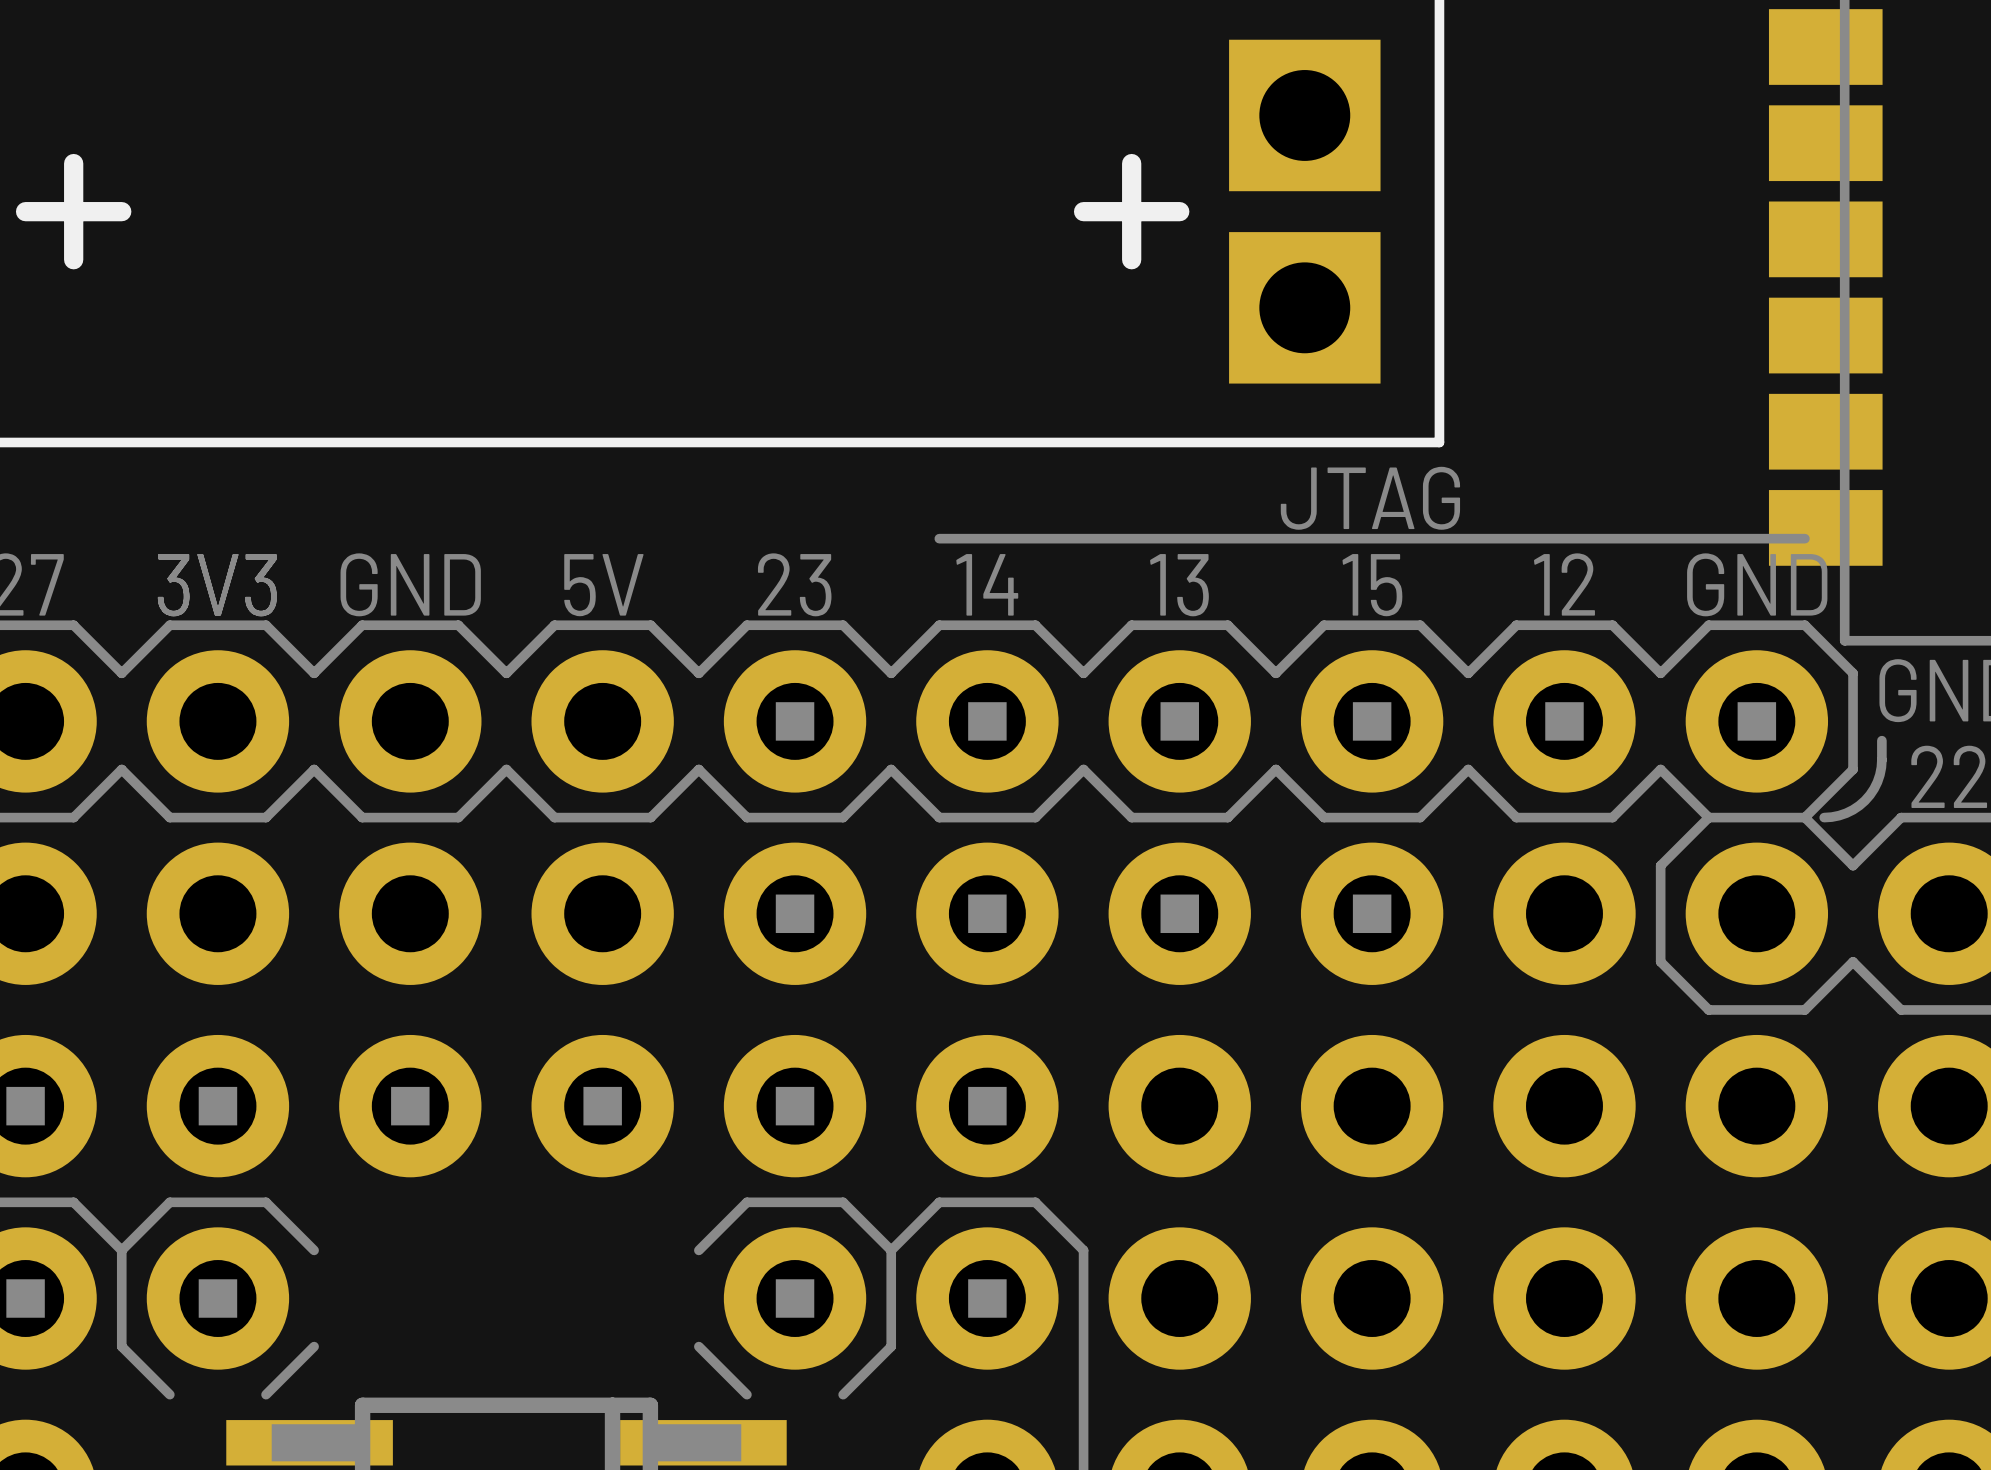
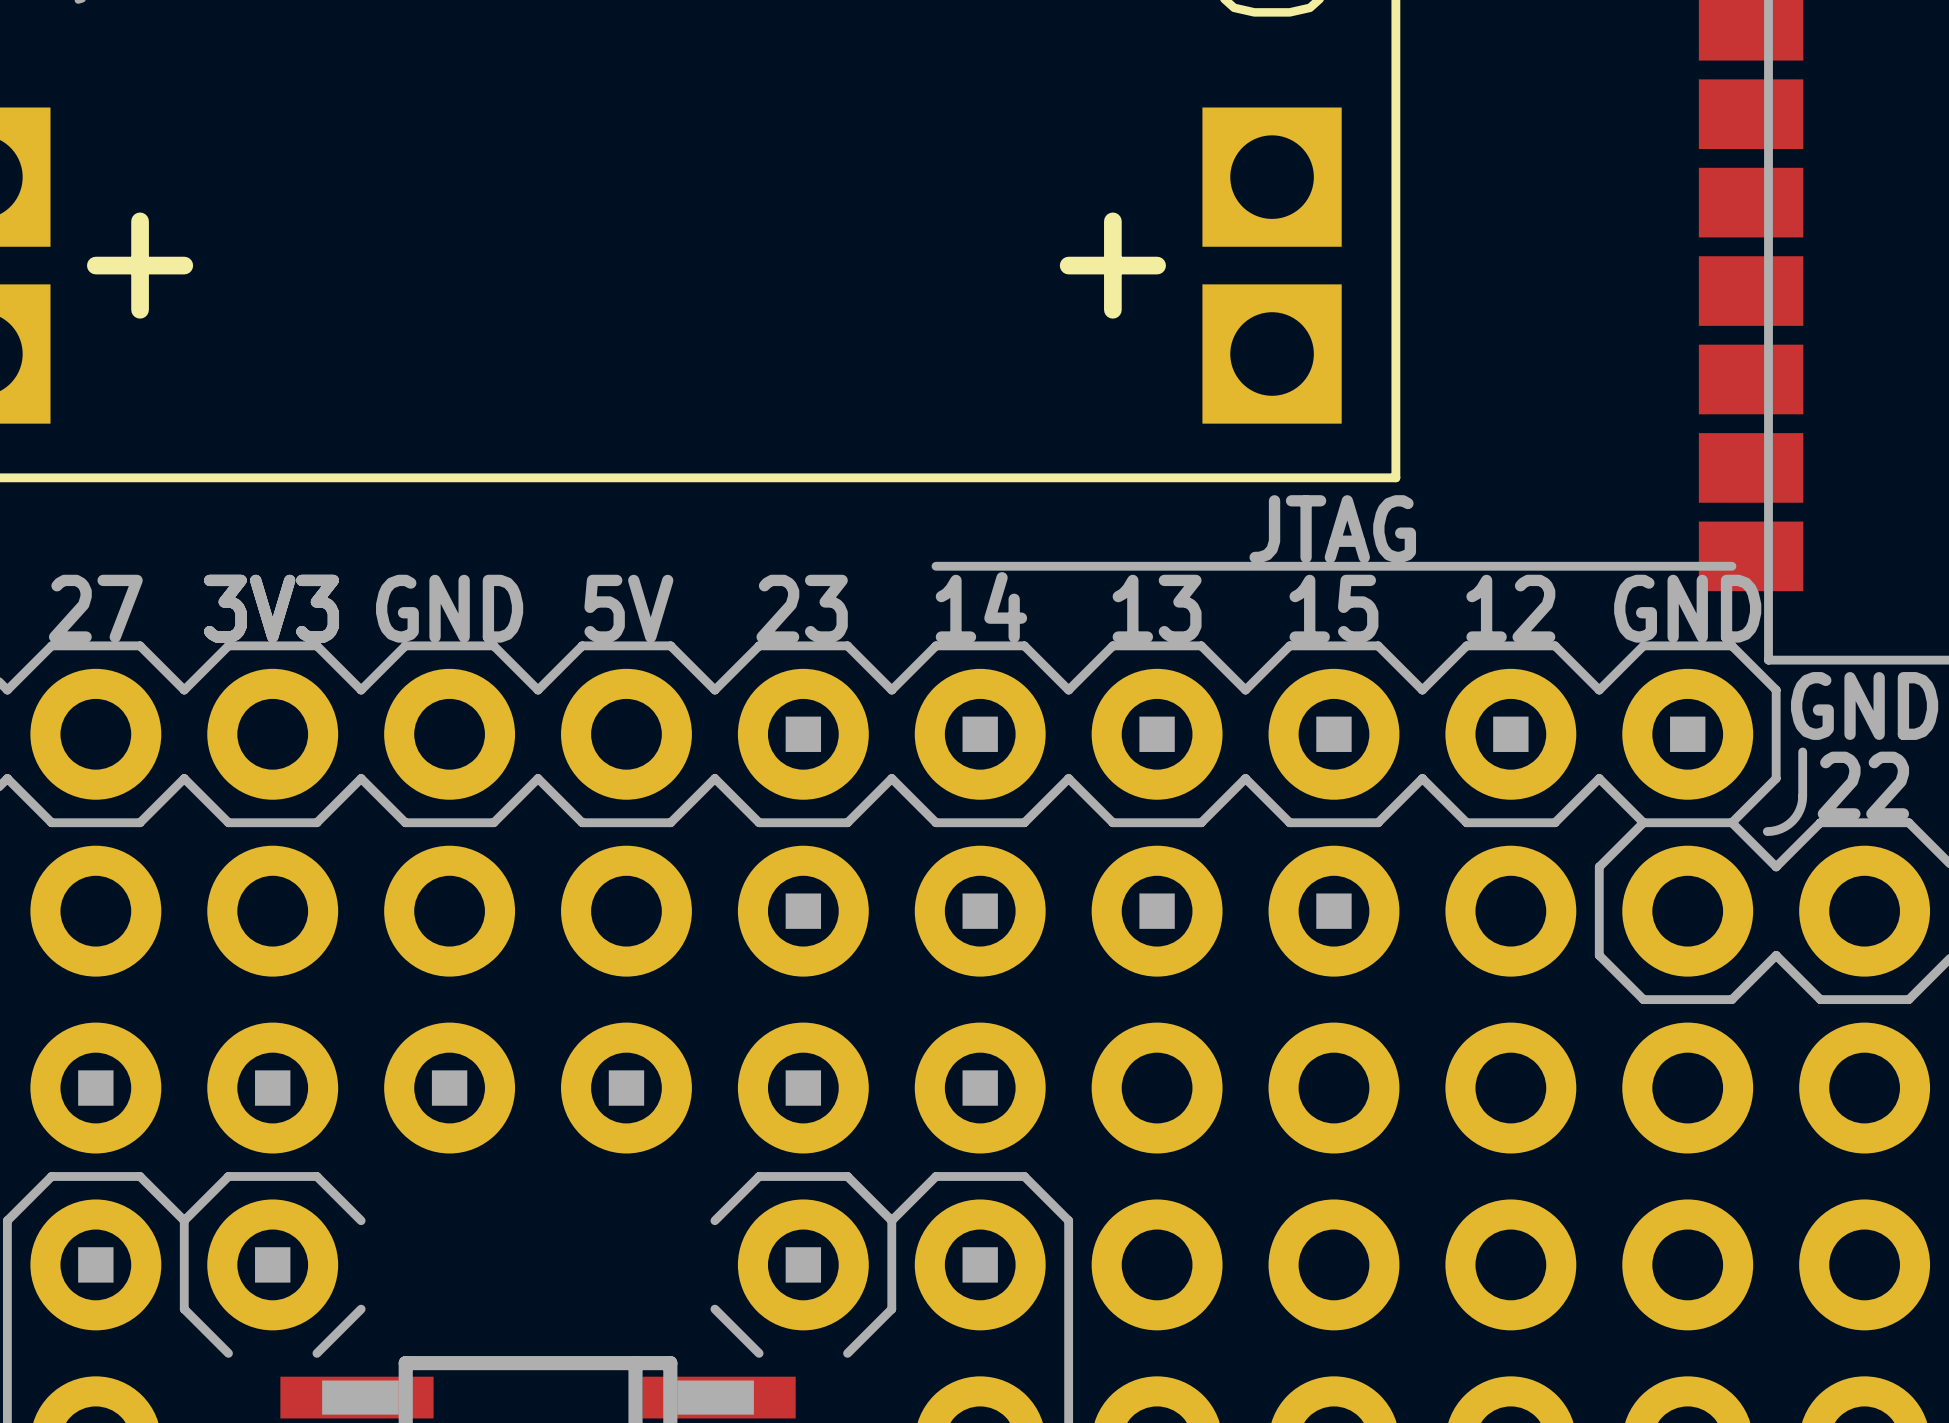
line: (1881, 759) (1877, 781) (1864, 800) (1846, 813) (1824, 817) -> (1802, 769) (1802, 800) (1797, 813) (1785, 826) (1767, 831)

